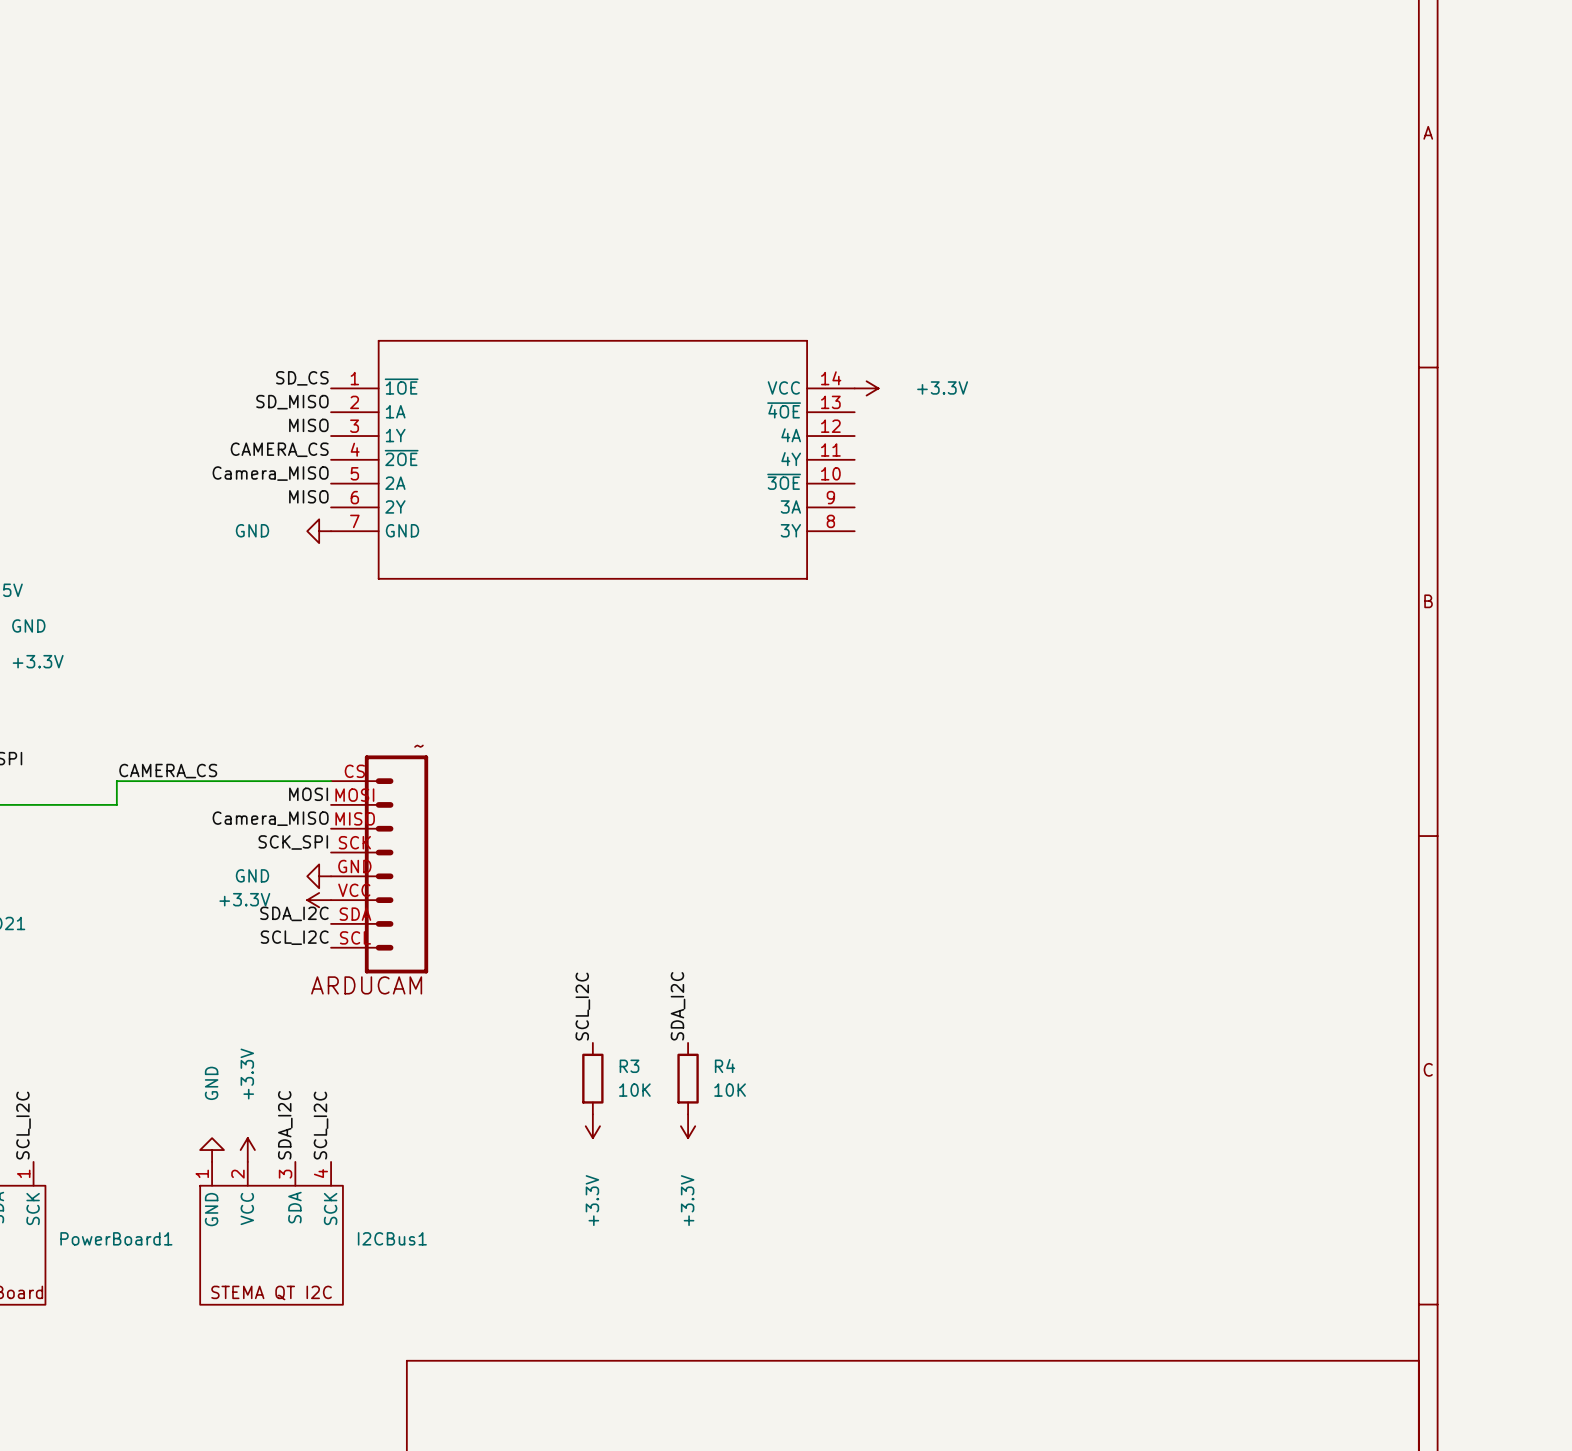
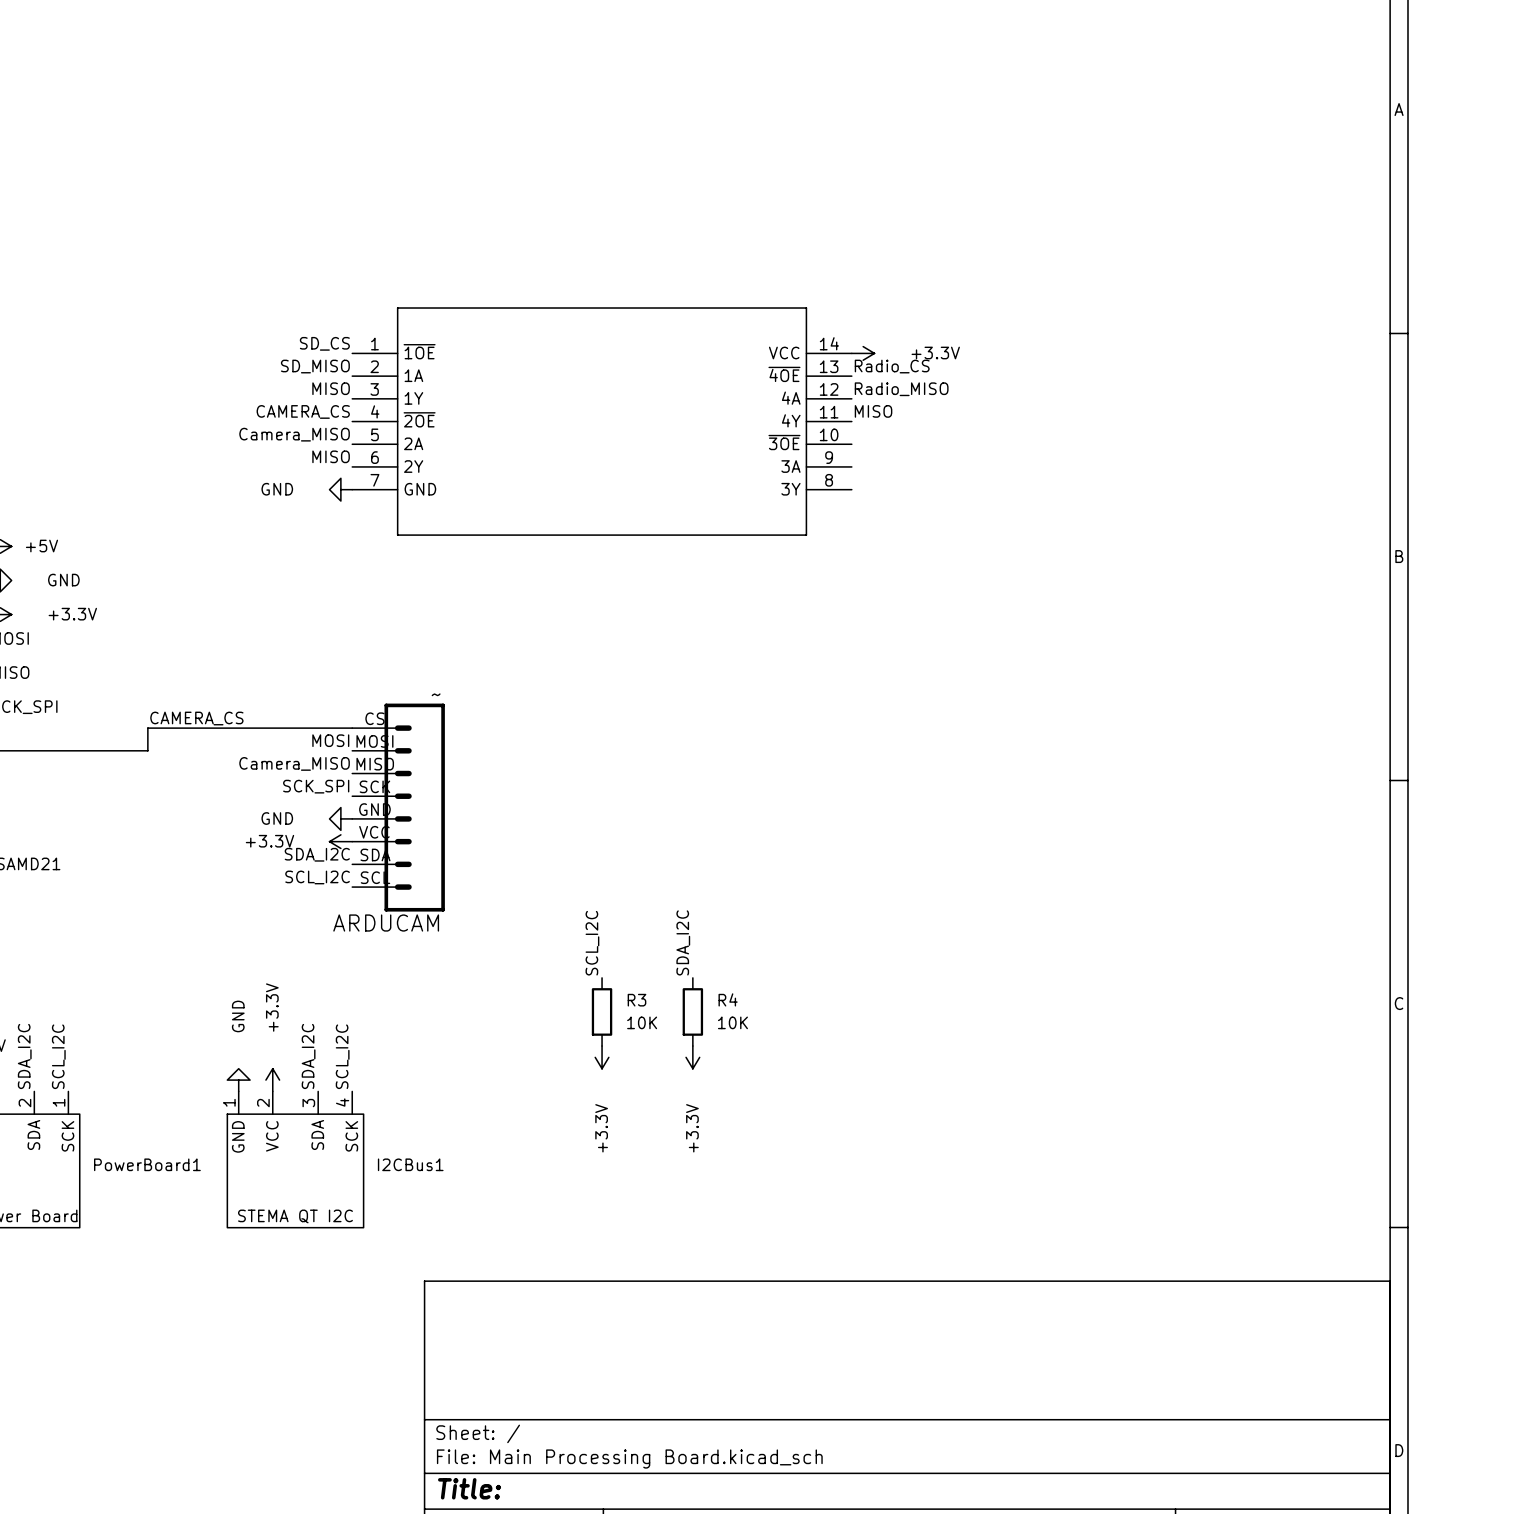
label: none -> Radio_CS (892, 366)
label: none -> Radio_MISO (901, 389)
label: none -> MISO (873, 411)

